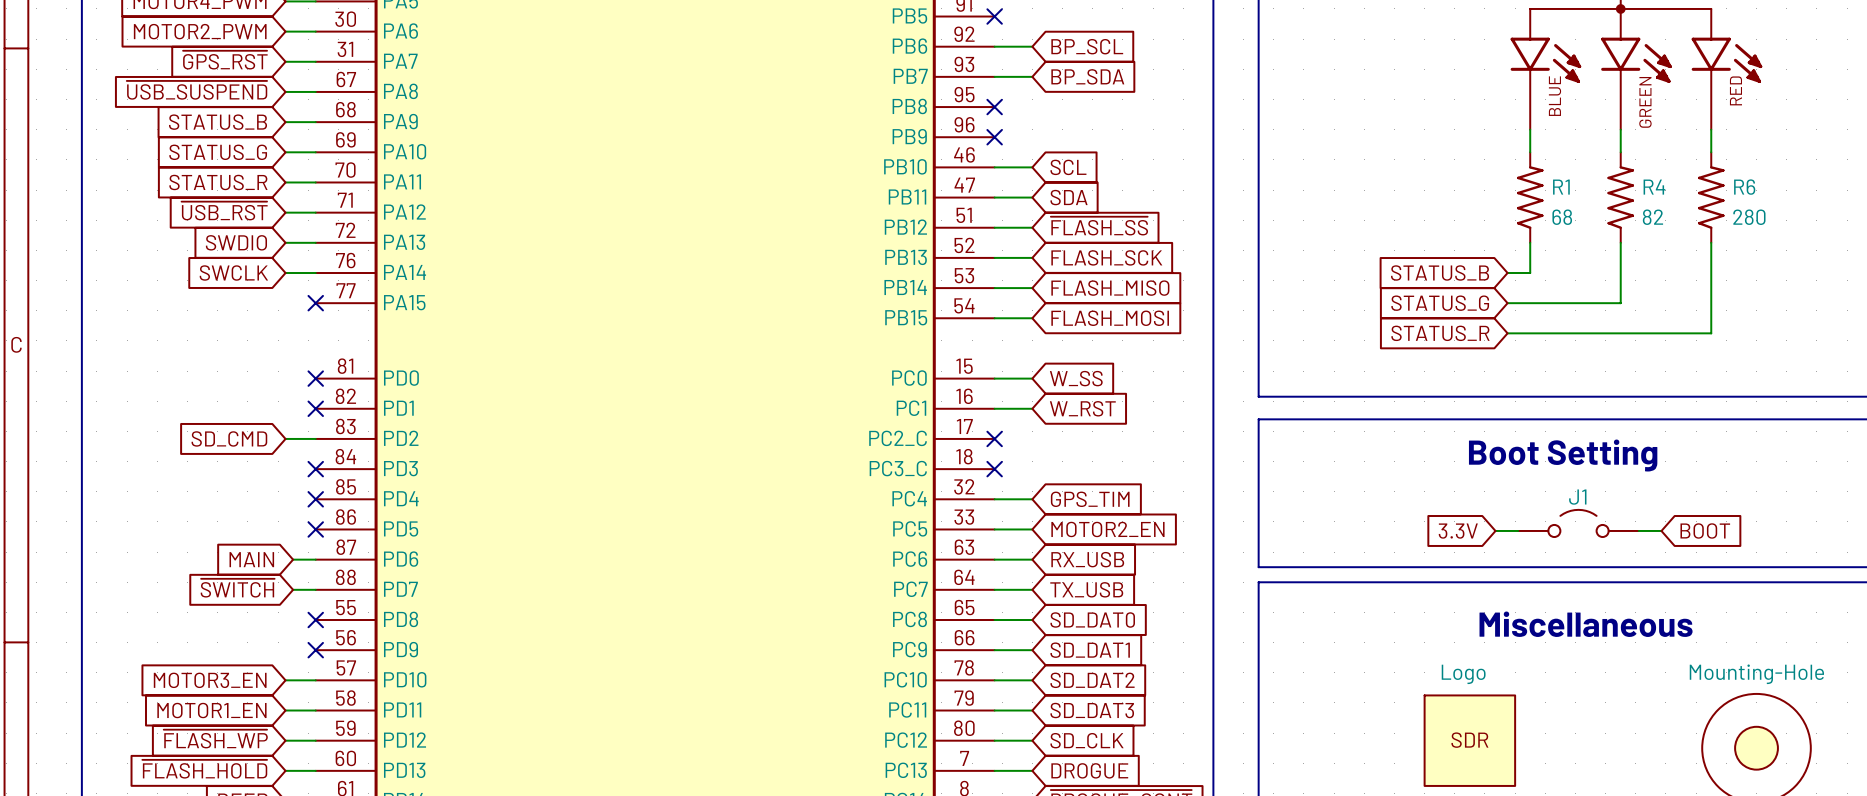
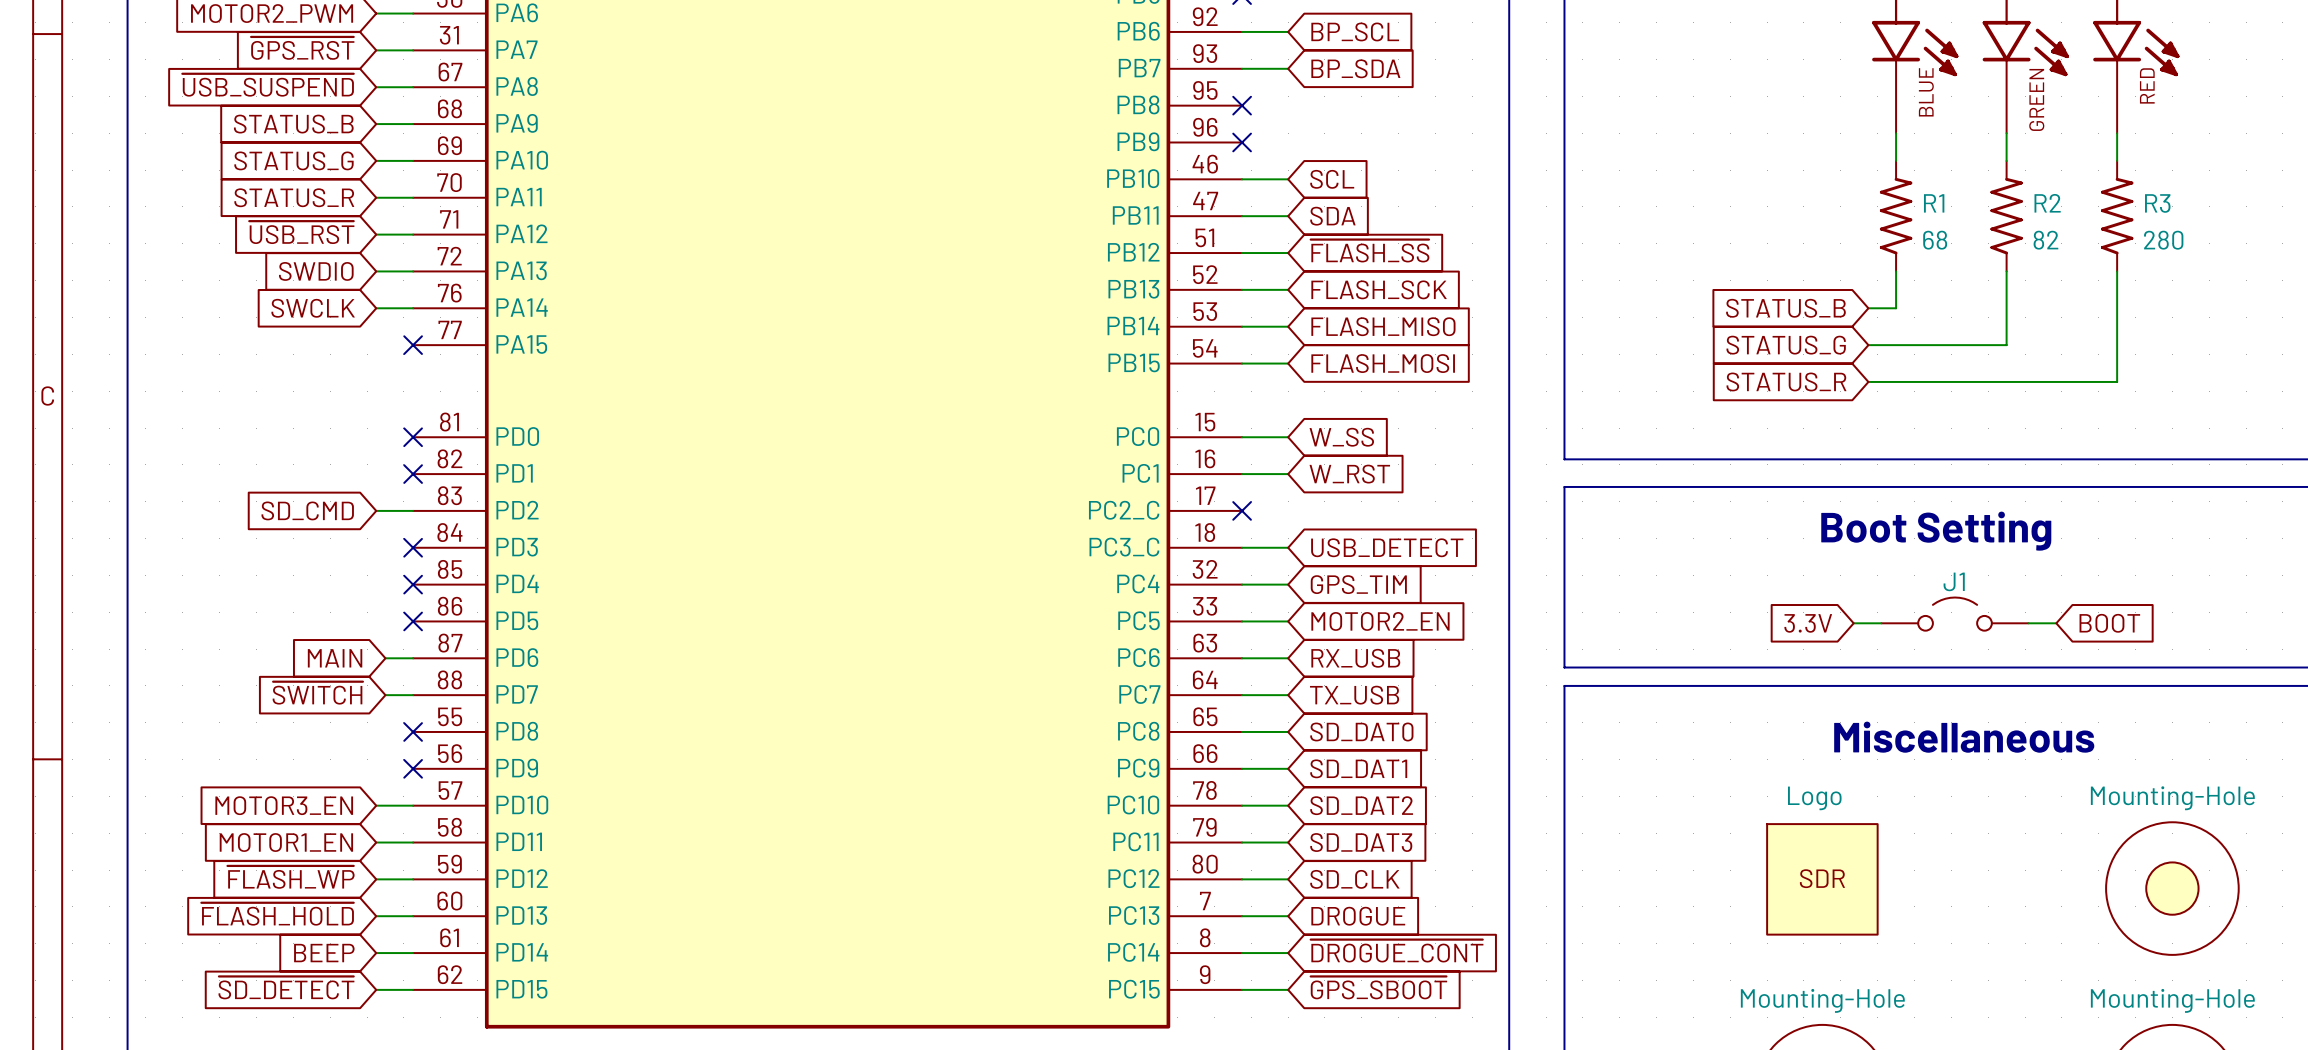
R4 name: R4 (1654, 187) -> R2 (2047, 203)
R6 name: R6 (1744, 187) -> R3 (2157, 203)
wire: none -> (1242, 547) (1288, 547)
no-connect mark: (994, 469) -> none
global label: none -> USB_DETECT (1387, 547)

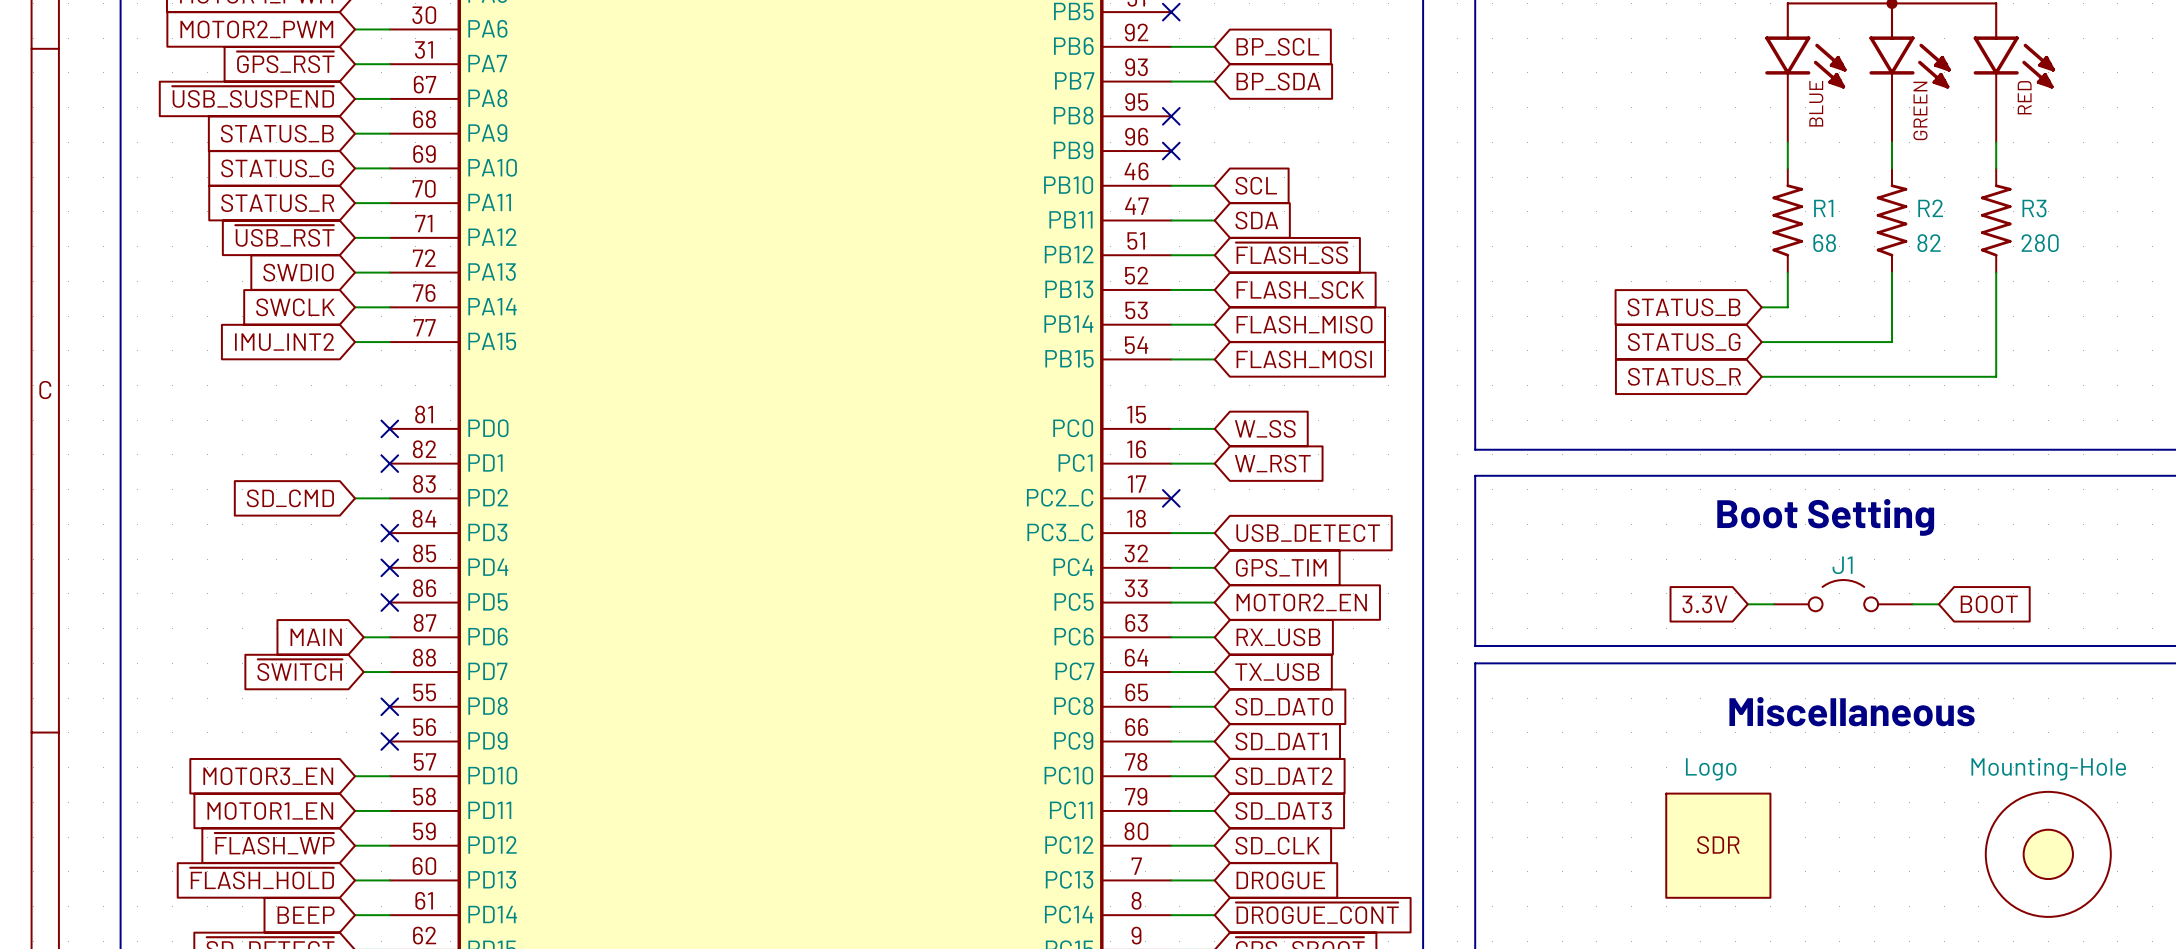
global label: none -> IMU_INT2 (284, 342)
wire: none -> (355, 342) (389, 342)
no-connect mark: (413, 345) -> none

